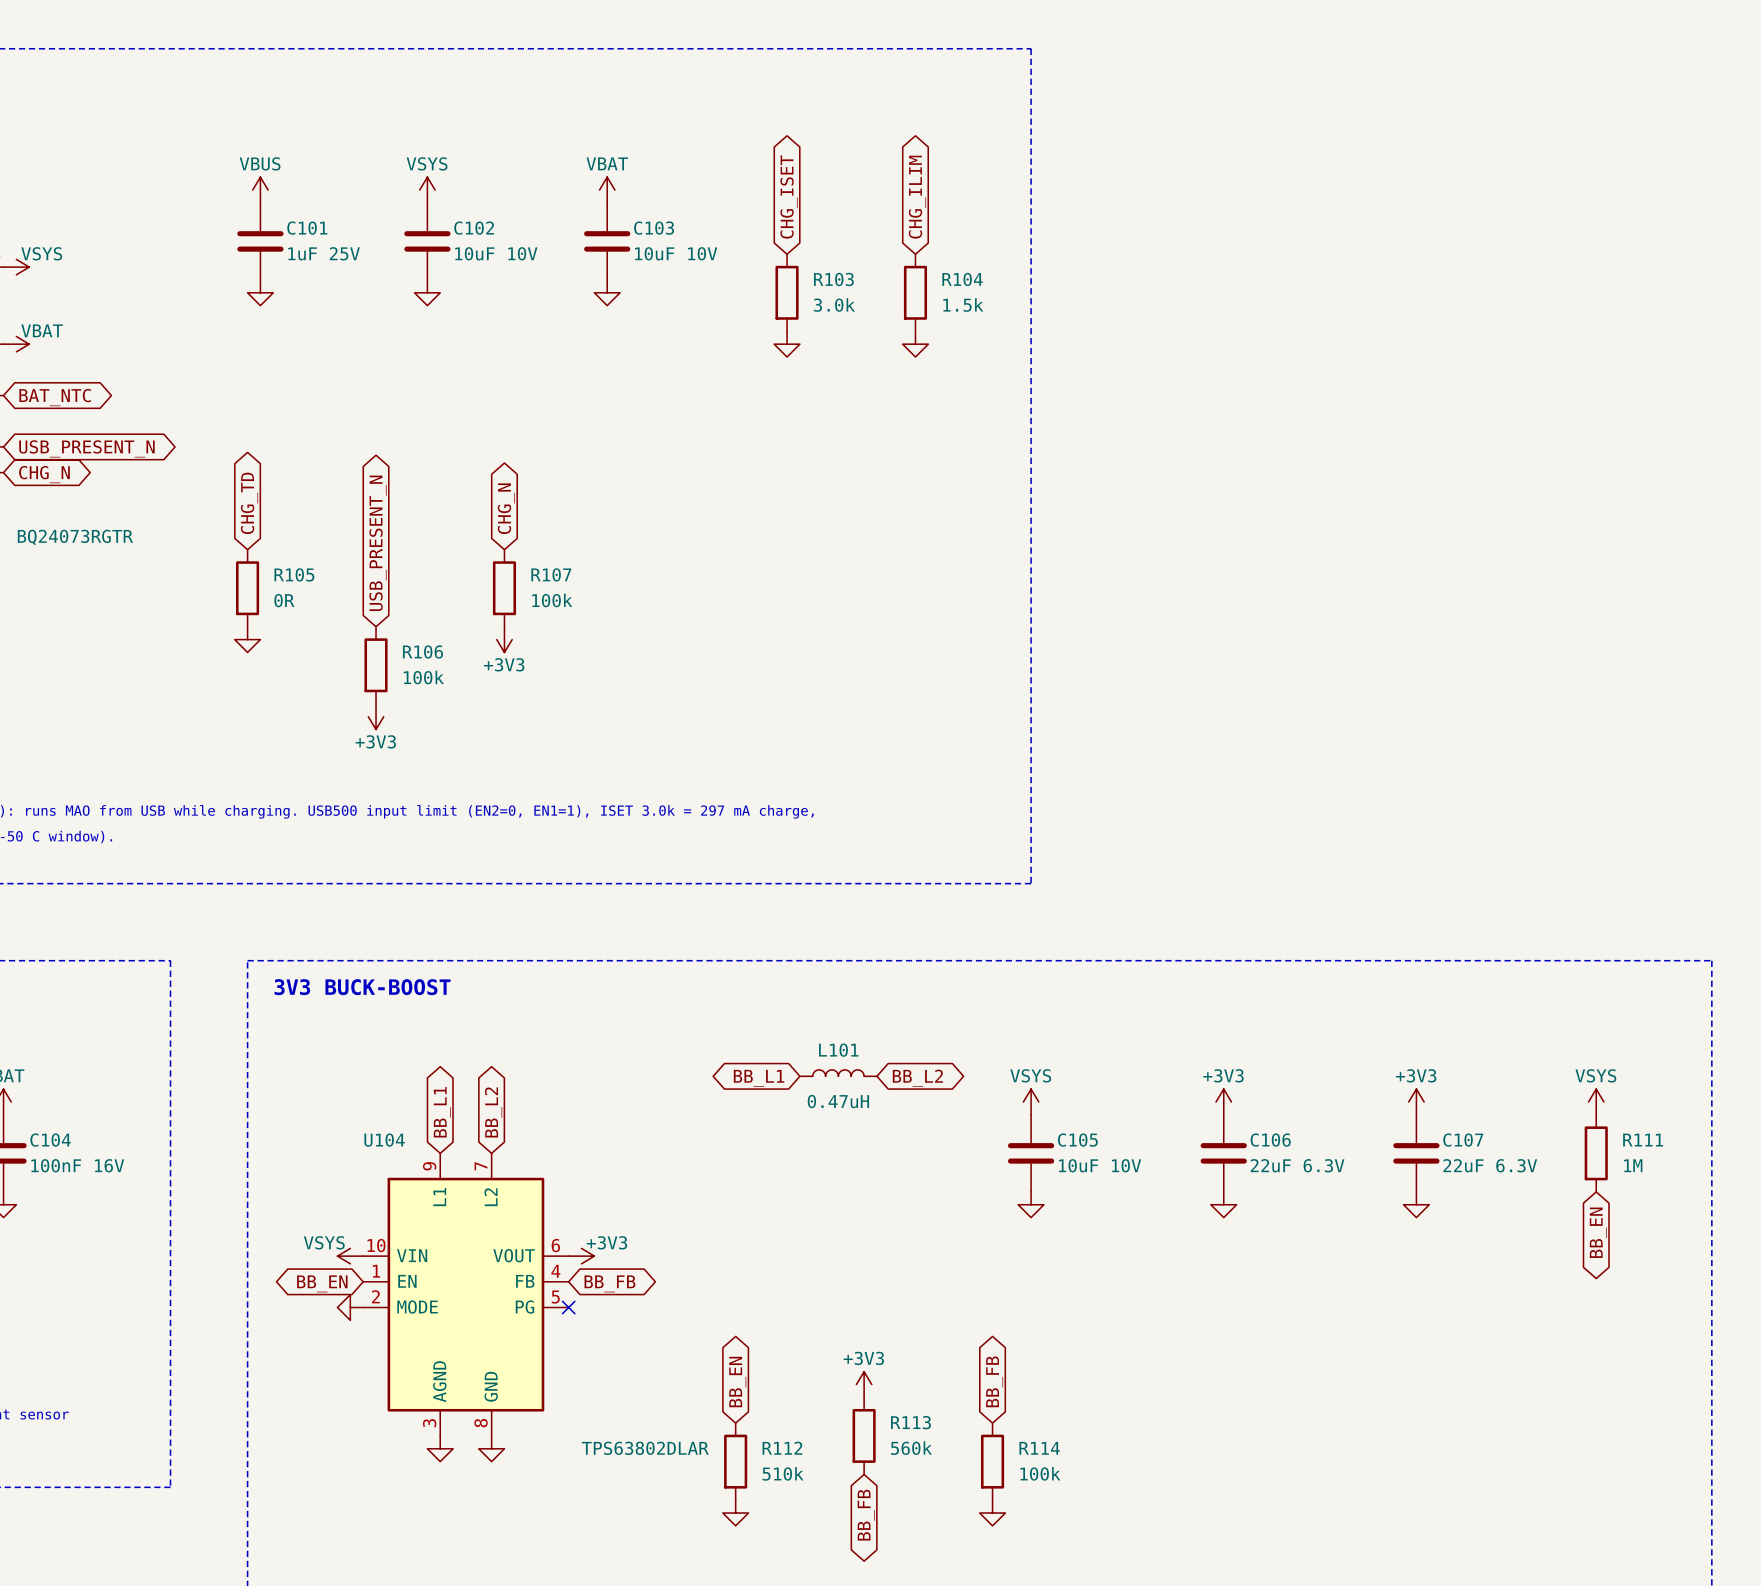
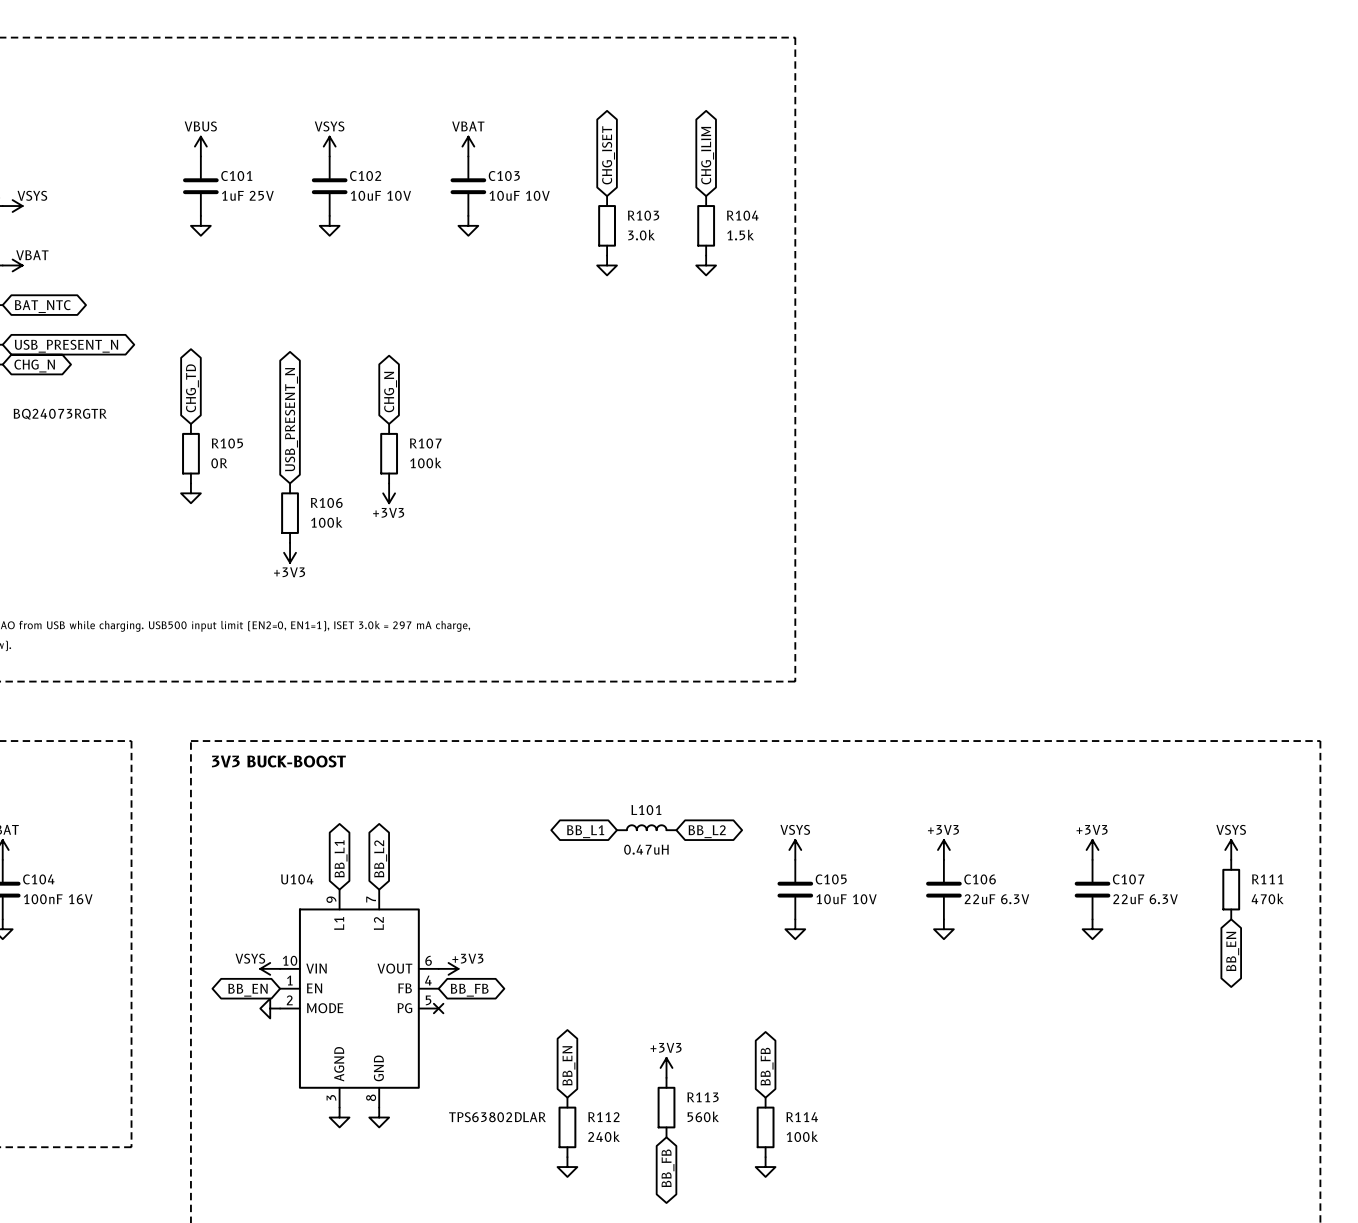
R111 value: 1M (1633, 1165) -> 470k (1267, 898)
R112 value: 510k (783, 1473) -> 240k (604, 1136)

